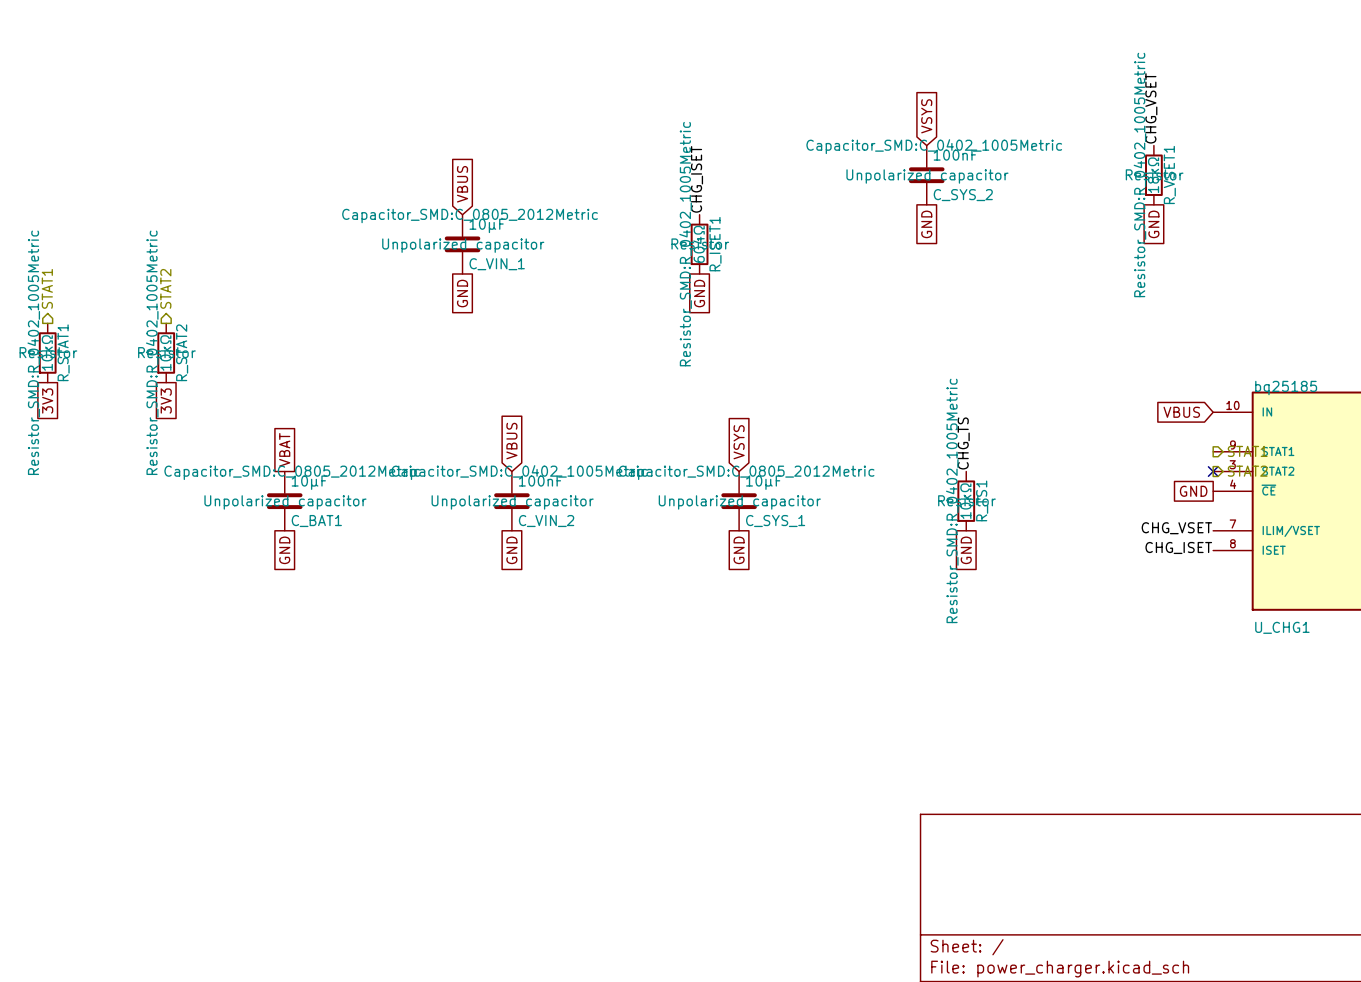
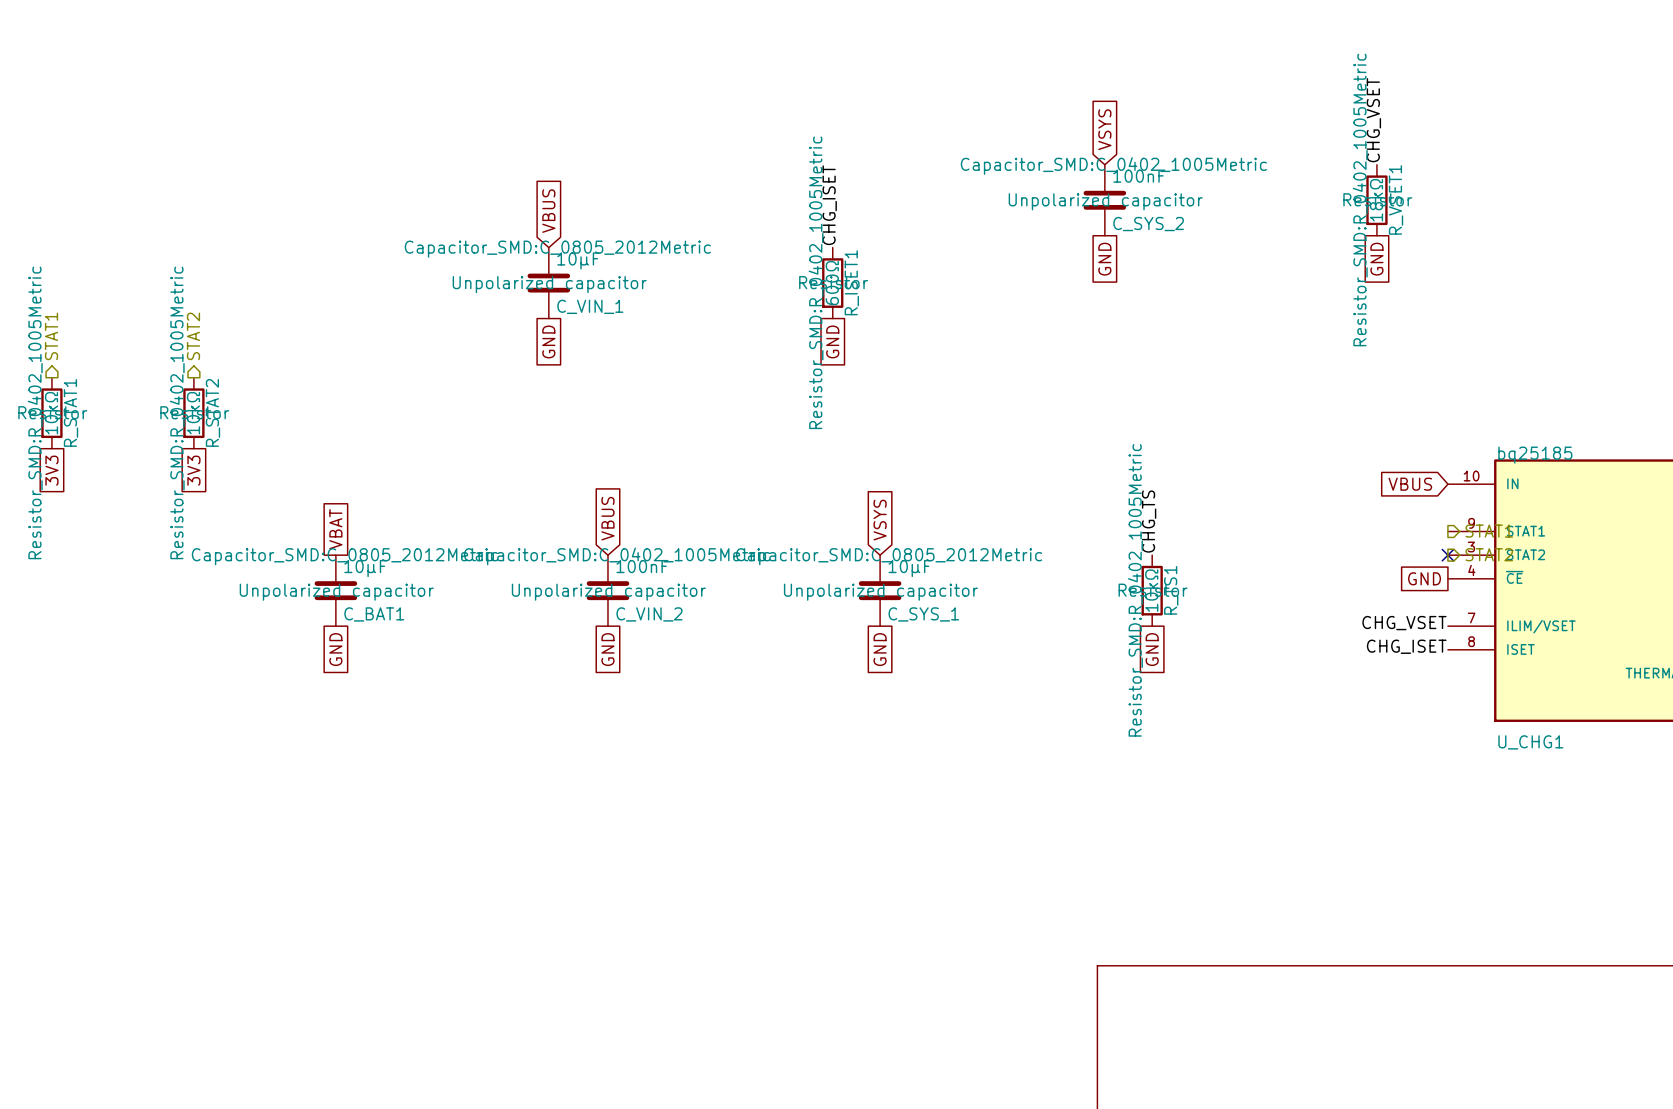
R_ISET1 value: 604Ω (698, 244) -> 600Ω (832, 283)

